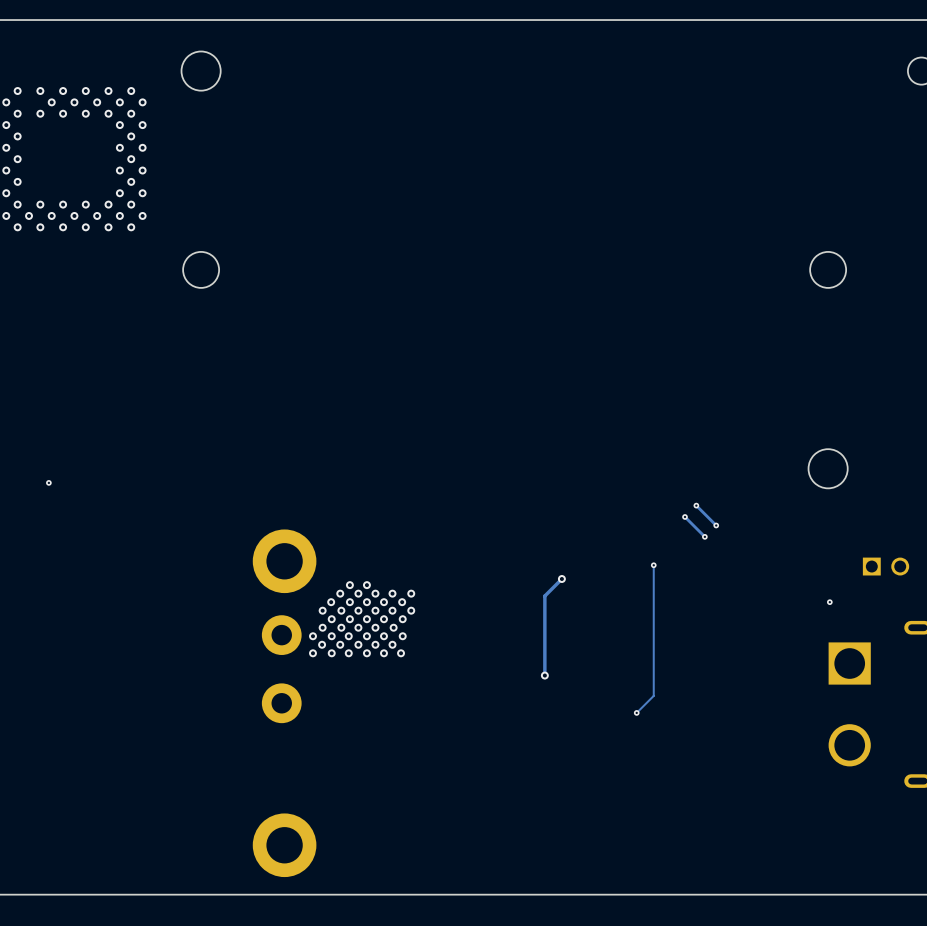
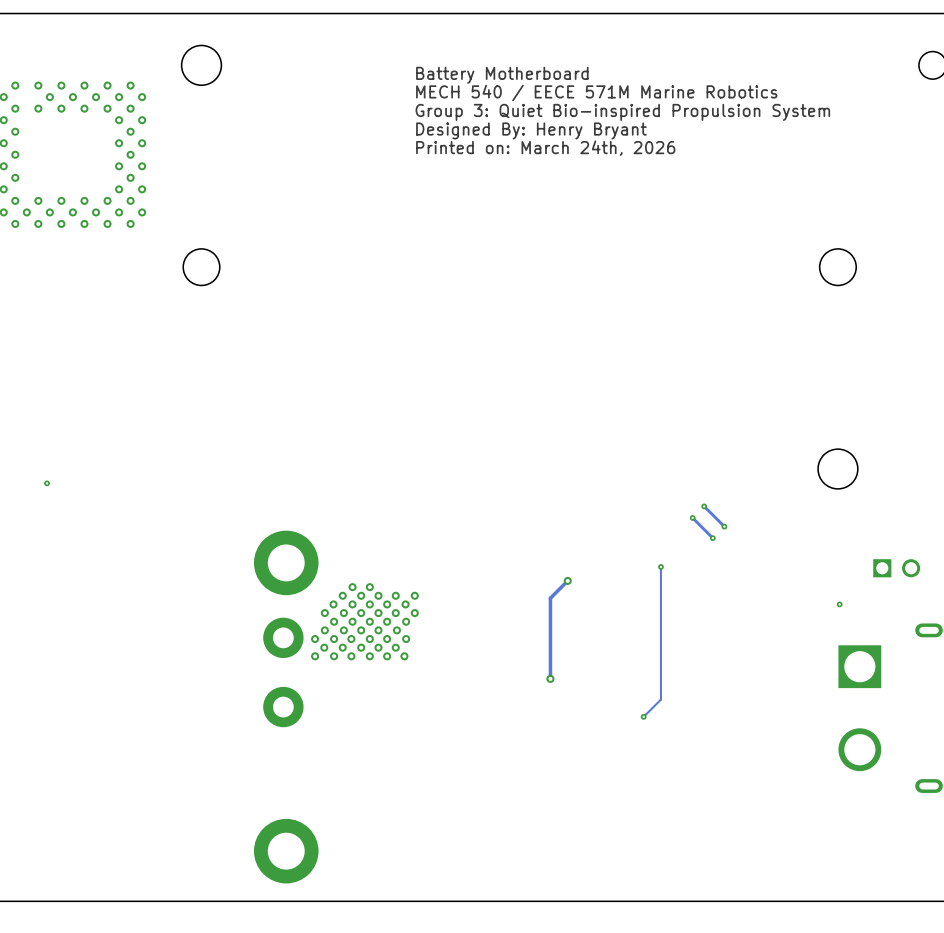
text: none -> Battery Motherboard (502, 75)
text: none -> MECH 540 / EECE 571M Marine Robotics (596, 93)
text: none -> Group 3: Quiet Bio-inspired Propulsion System (622, 112)
text: none -> Designed By: Henry Bryant (531, 130)
text: none -> Printed on: March 24th, 2026 (545, 148)

